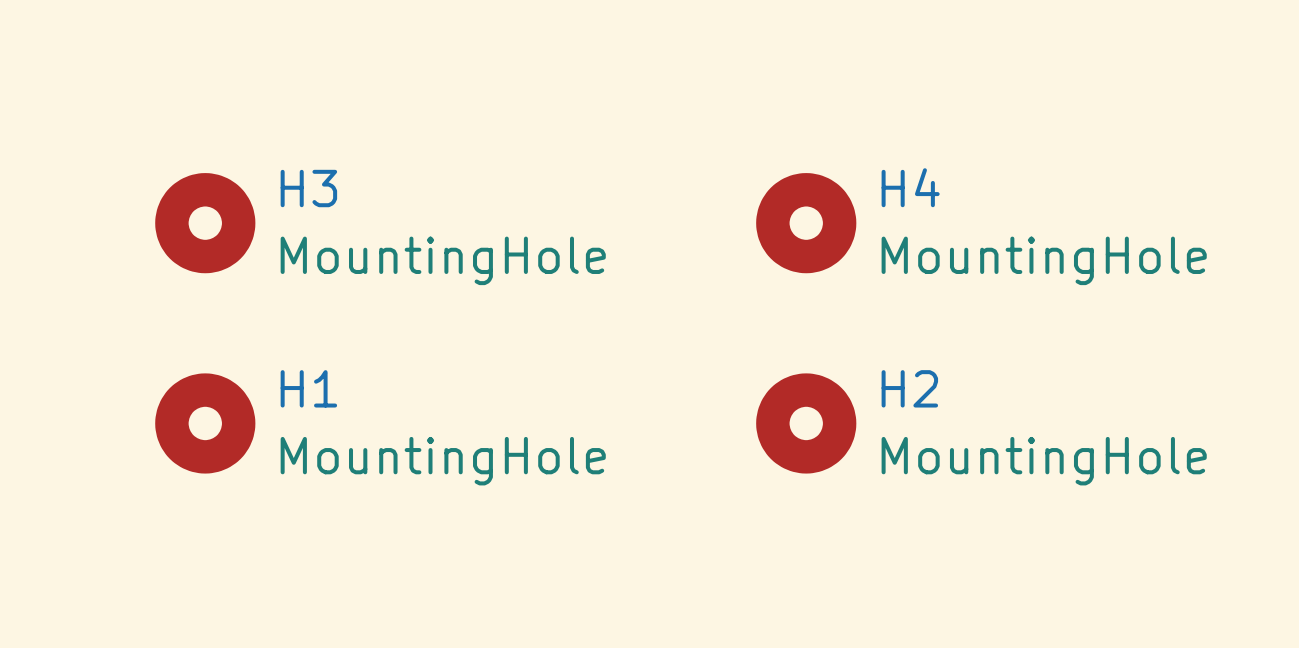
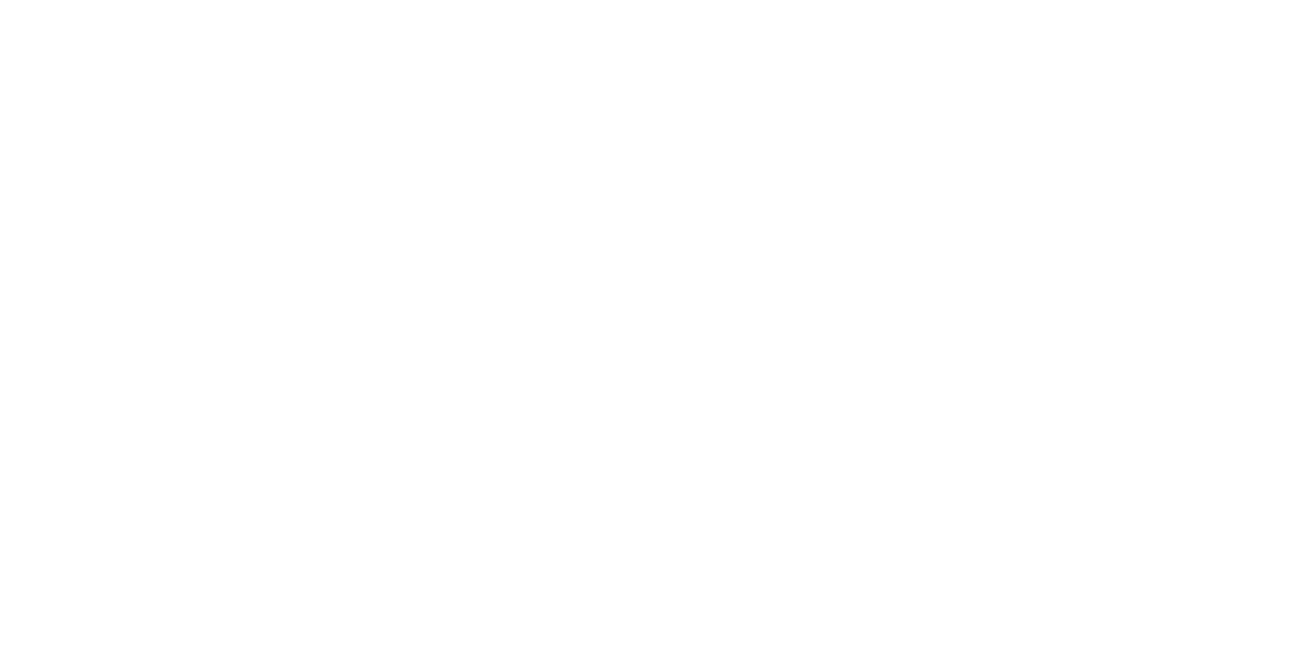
H3: MountingHole (205, 223) -> none
H4: MountingHole (806, 223) -> none
H1: MountingHole (205, 423) -> none
H2: MountingHole (806, 423) -> none

